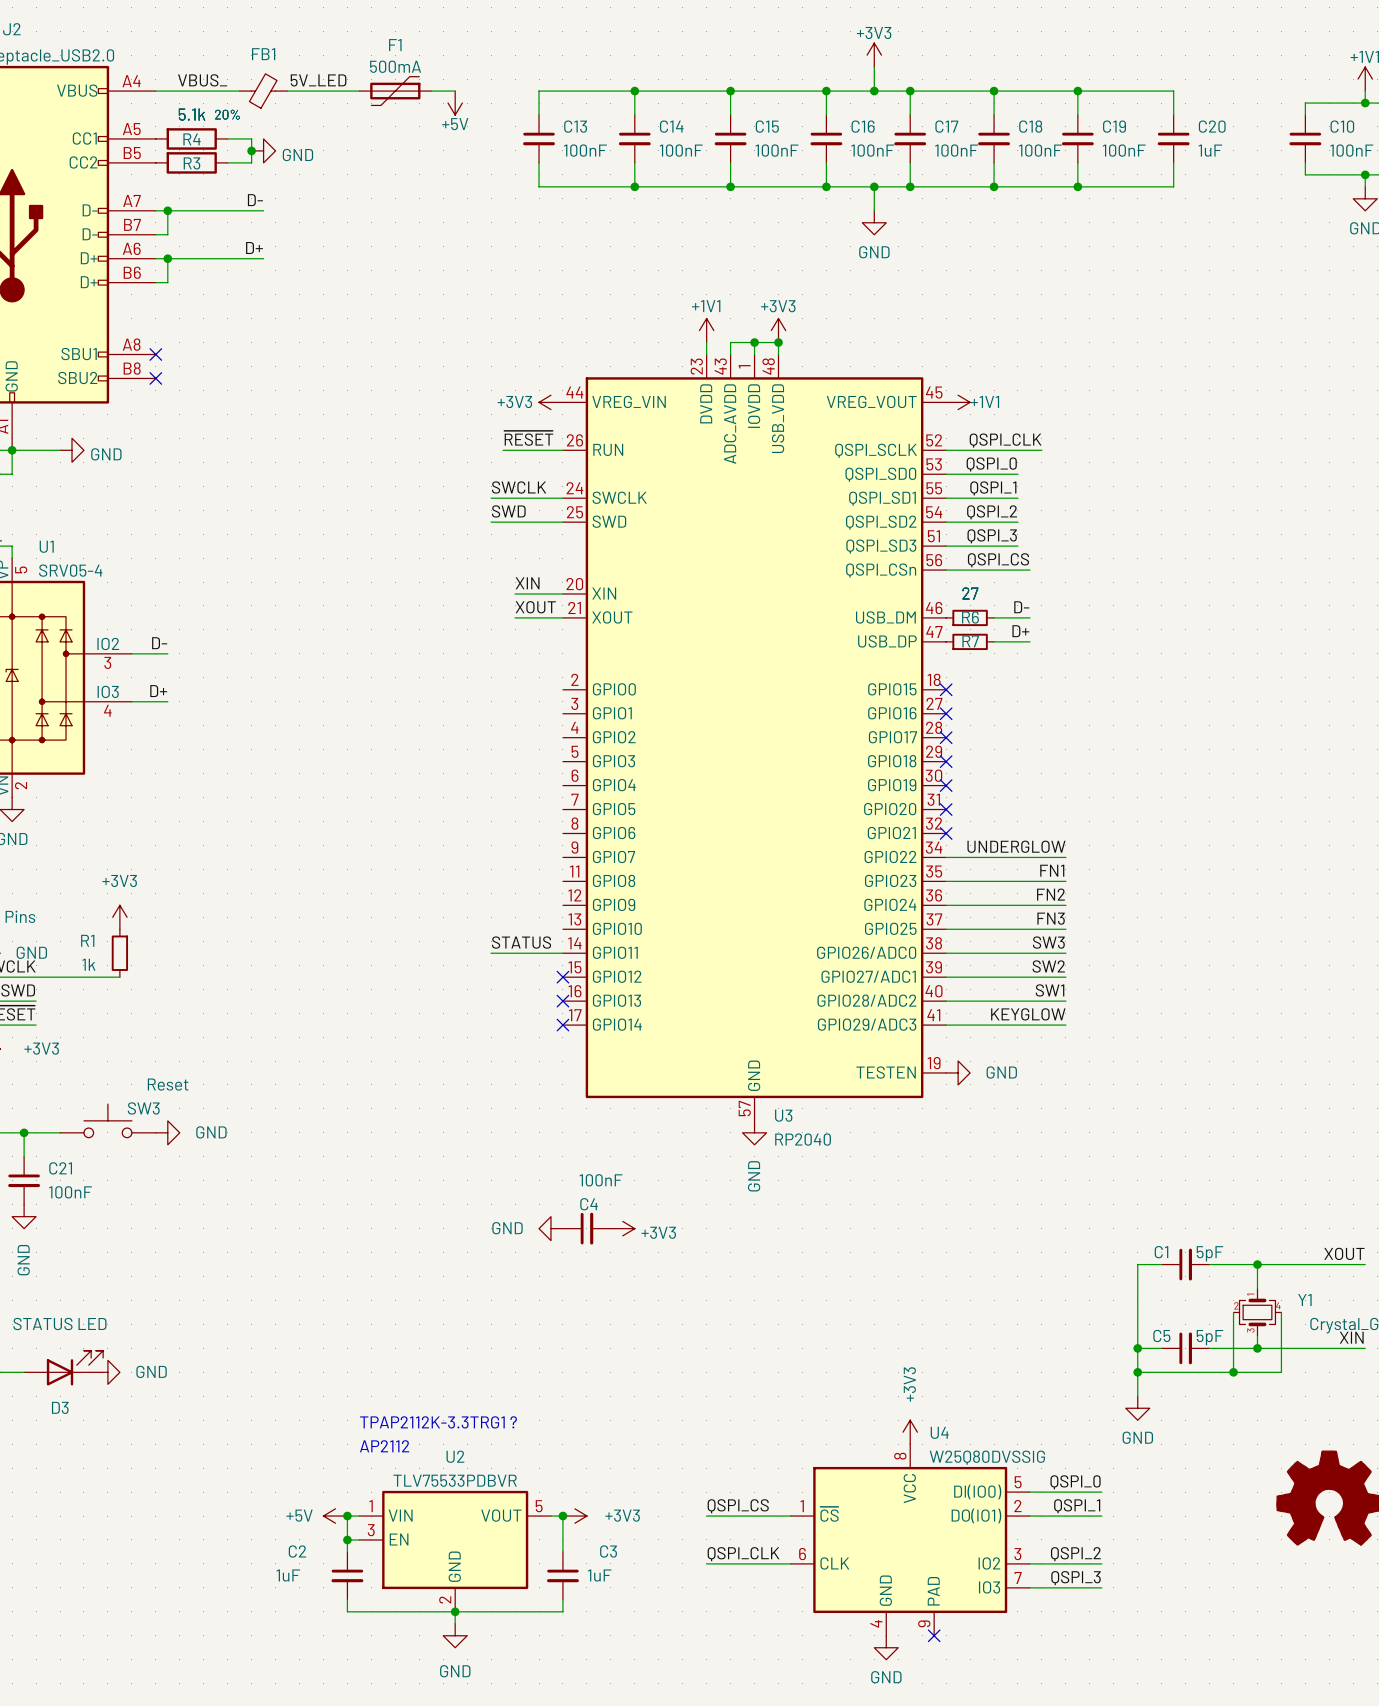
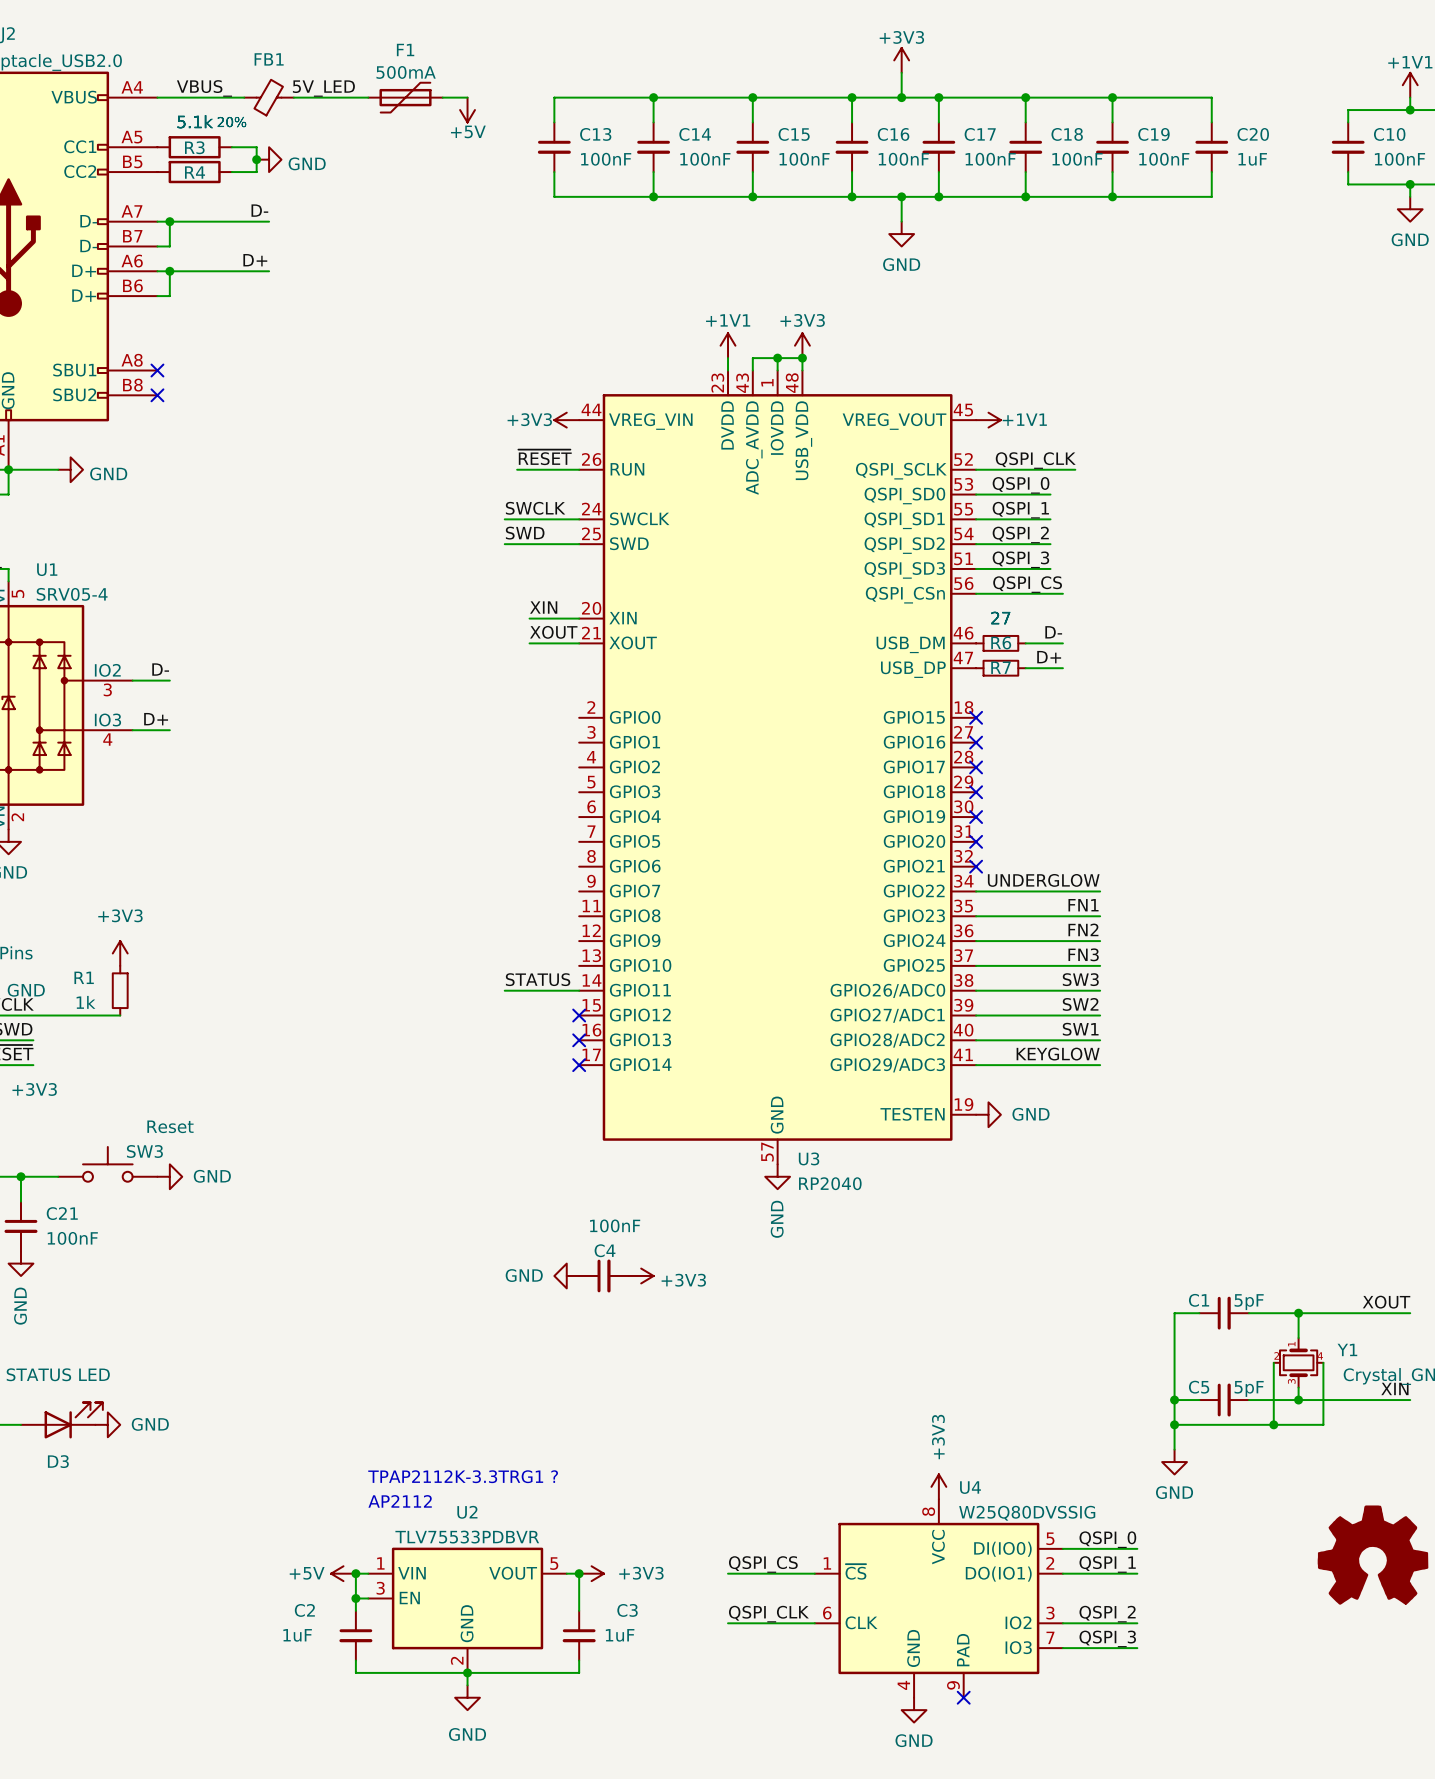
R4 name: R4 (192, 139) -> R3 (194, 147)
R3 name: R3 (191, 163) -> R4 (195, 172)

